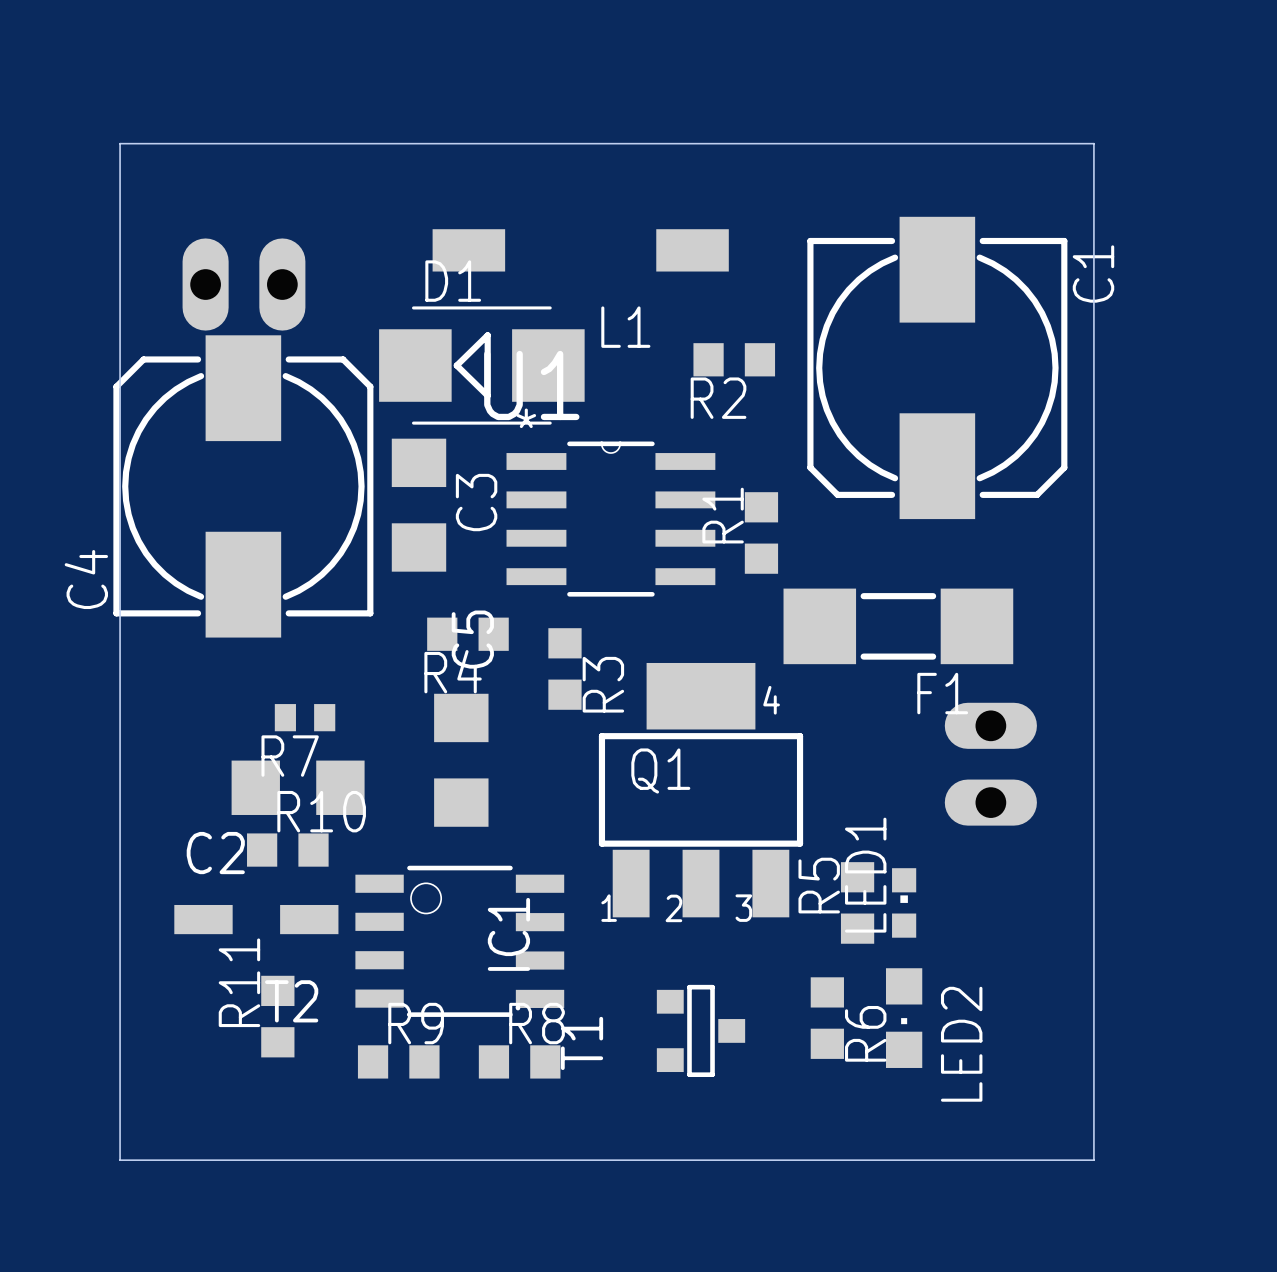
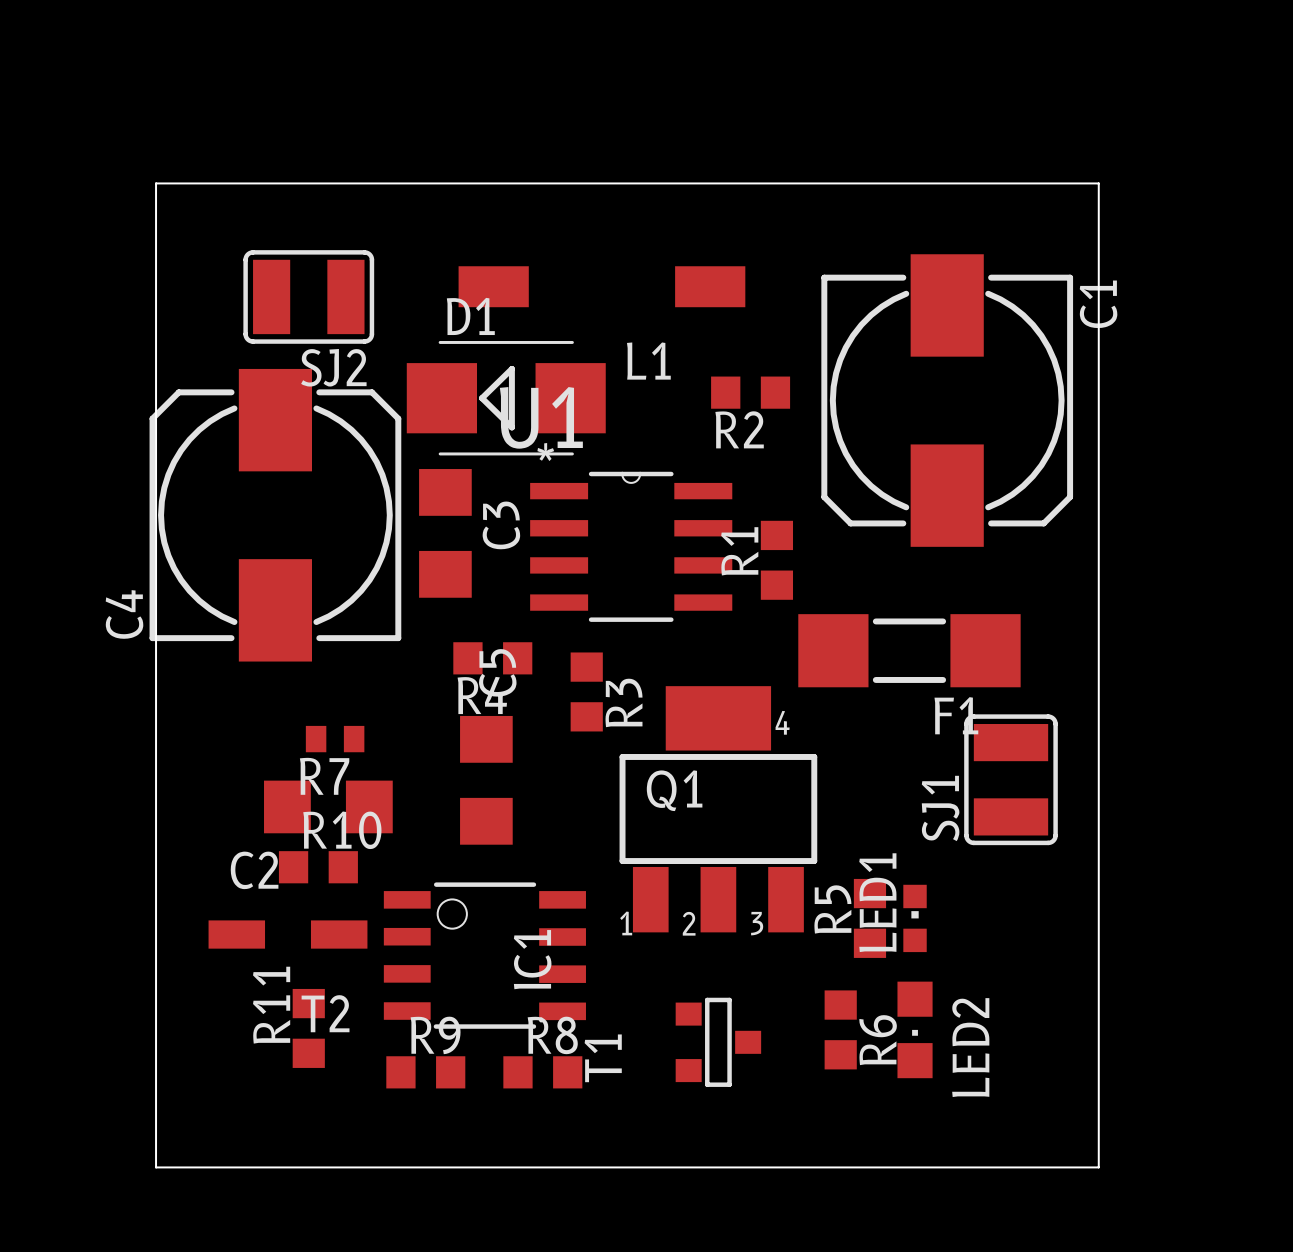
SJ2: none -> (308, 296)
part: (243, 284) -> none
SJ1: none -> (1010, 779)
part: (990, 764) -> none

